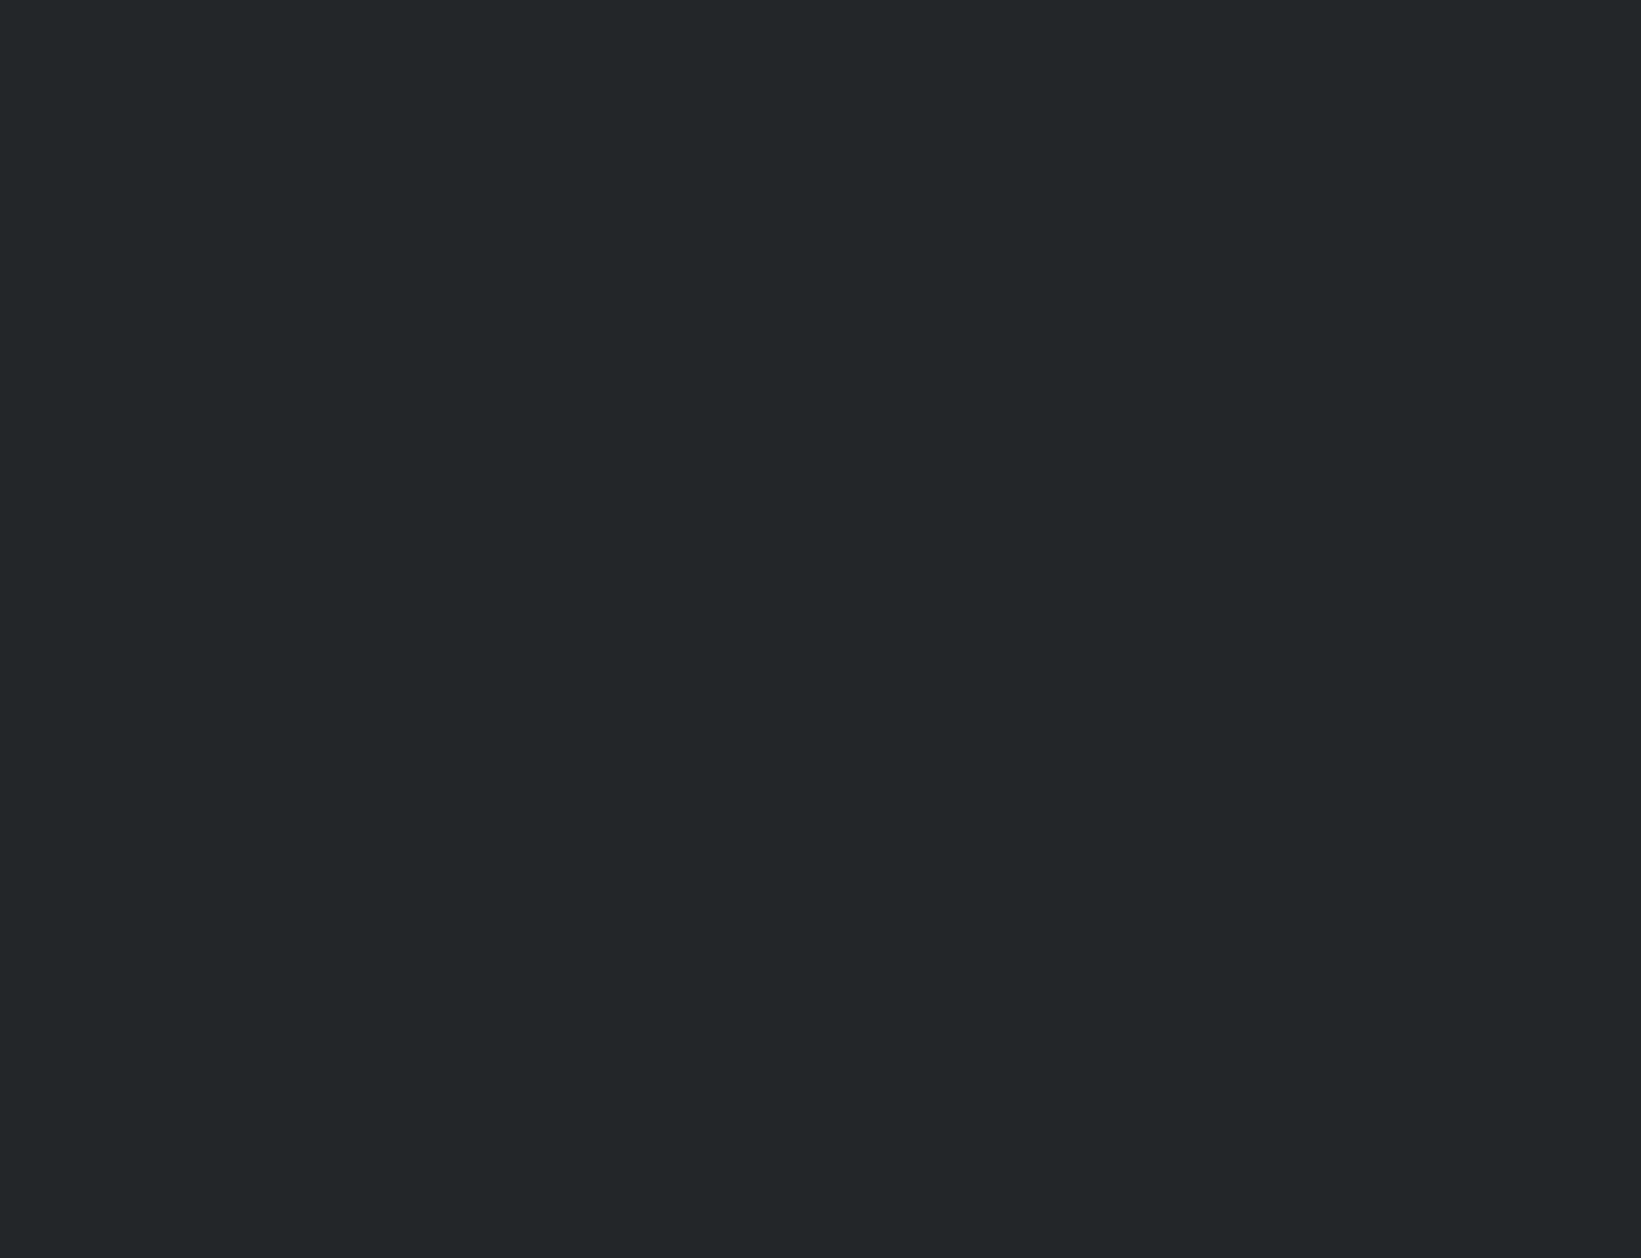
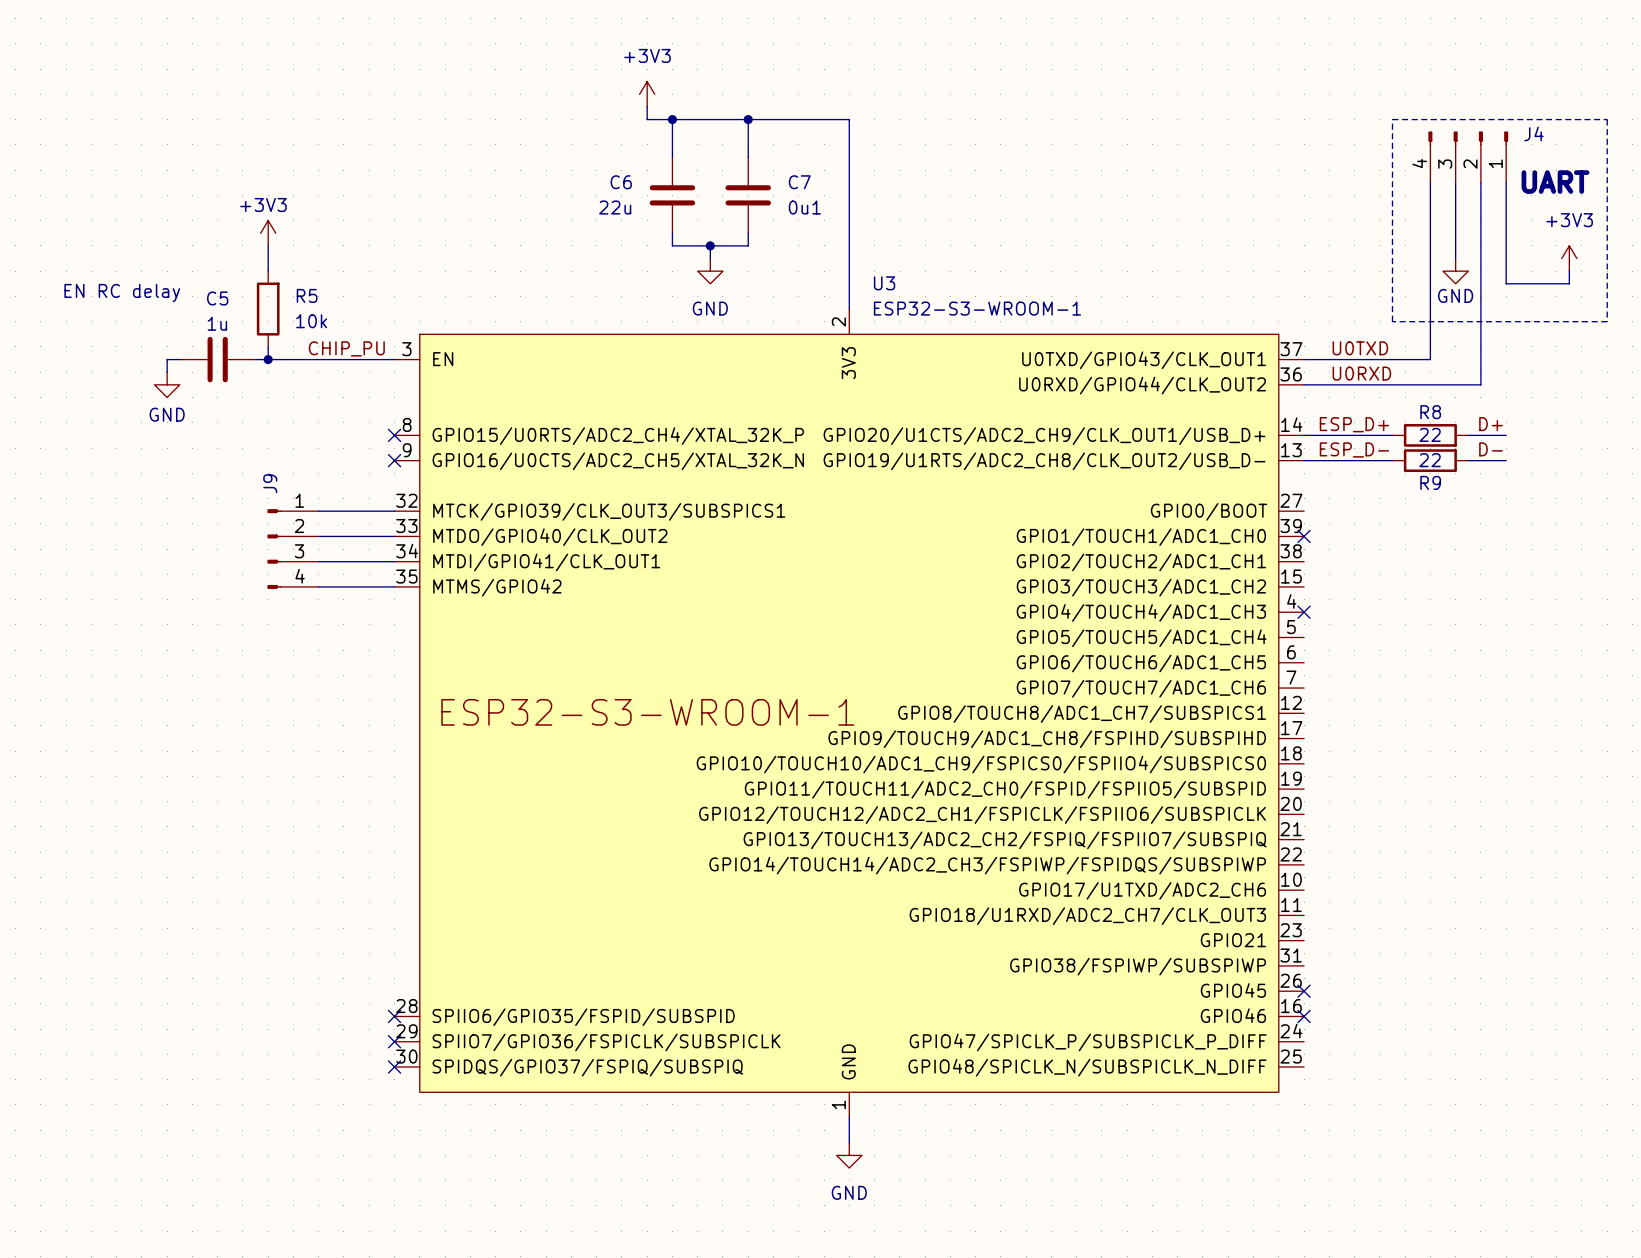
power symbol: none -> +3V3 (647, 94)
wire: none -> (647, 106) (647, 119) (849, 119) (849, 309)
wire: none -> (672, 119) (672, 157)
junction: none -> (672, 119)
wire: none -> (748, 119) (748, 157)
junction: none -> (748, 119)
line: none -> (1392, 119) (1607, 119) (1607, 321) (1392, 321) (1392, 119)
J4: none -> (1468, 157)
wire: none -> (1430, 182) (1430, 359) (1304, 359)
wire: none -> (1455, 182) (1455, 258)
wire: none -> (1480, 182) (1480, 384) (1304, 384)
wire: none -> (1506, 182) (1506, 283) (1569, 283) (1569, 271)
text: none -> UART (1555, 182)
C6: none -> 22u (672, 195)
C7: none -> 0u1 (748, 195)
power symbol: none -> +3V3 (268, 233)
wire: none -> (672, 233) (672, 245) (748, 245) (748, 233)
wire: none -> (268, 245) (268, 271)
wire: none -> (710, 245) (710, 258)
junction: none -> (710, 245)
power symbol: none -> +3V3 (1569, 258)
power symbol: none -> GND (710, 271)
power symbol: none -> GND (1455, 271)
text: none -> EN RC delay (122, 293)
R5: none -> 10k (268, 309)
wire: none -> (268, 346) (268, 359)
label: none -> CHIP_PU (346, 348)
label: none -> U0TXD (1360, 348)
wire: none -> (179, 359) (167, 359) (167, 372)
C5: none -> 1u (217, 359)
wire: none -> (255, 359) (394, 359)
junction: none -> (268, 359)
label: none -> U0RXD (1361, 373)
power symbol: none -> GND (167, 384)
label: none -> ESP_D+ (1354, 424)
label: none -> D+ (1491, 424)
no-connect mark: none -> (394, 435)
wire: none -> (1304, 435) (1392, 435)
R8: none -> 22 (1430, 435)
wire: none -> (1468, 435) (1506, 435)
label: none -> ESP_D- (1354, 449)
label: none -> D- (1491, 449)
no-connect mark: none -> (394, 460)
wire: none -> (1304, 460) (1392, 460)
R9: none -> 22 (1430, 460)
wire: none -> (1468, 460) (1506, 460)
wire: none -> (318, 511) (394, 511)
wire: none -> (318, 536) (394, 536)
no-connect mark: none -> (1304, 536)
J9: none -> (293, 549)
wire: none -> (318, 561) (394, 561)
wire: none -> (318, 586) (394, 586)
no-connect mark: none -> (1304, 612)
U3: none -> ESP32-S3-WROOM-1 (849, 713)
no-connect mark: none -> (1304, 991)
no-connect mark: none -> (394, 1016)
no-connect mark: none -> (1304, 1016)
no-connect mark: none -> (394, 1041)
no-connect mark: none -> (394, 1067)
wire: none -> (849, 1117) (849, 1142)
power symbol: none -> GND (849, 1155)

